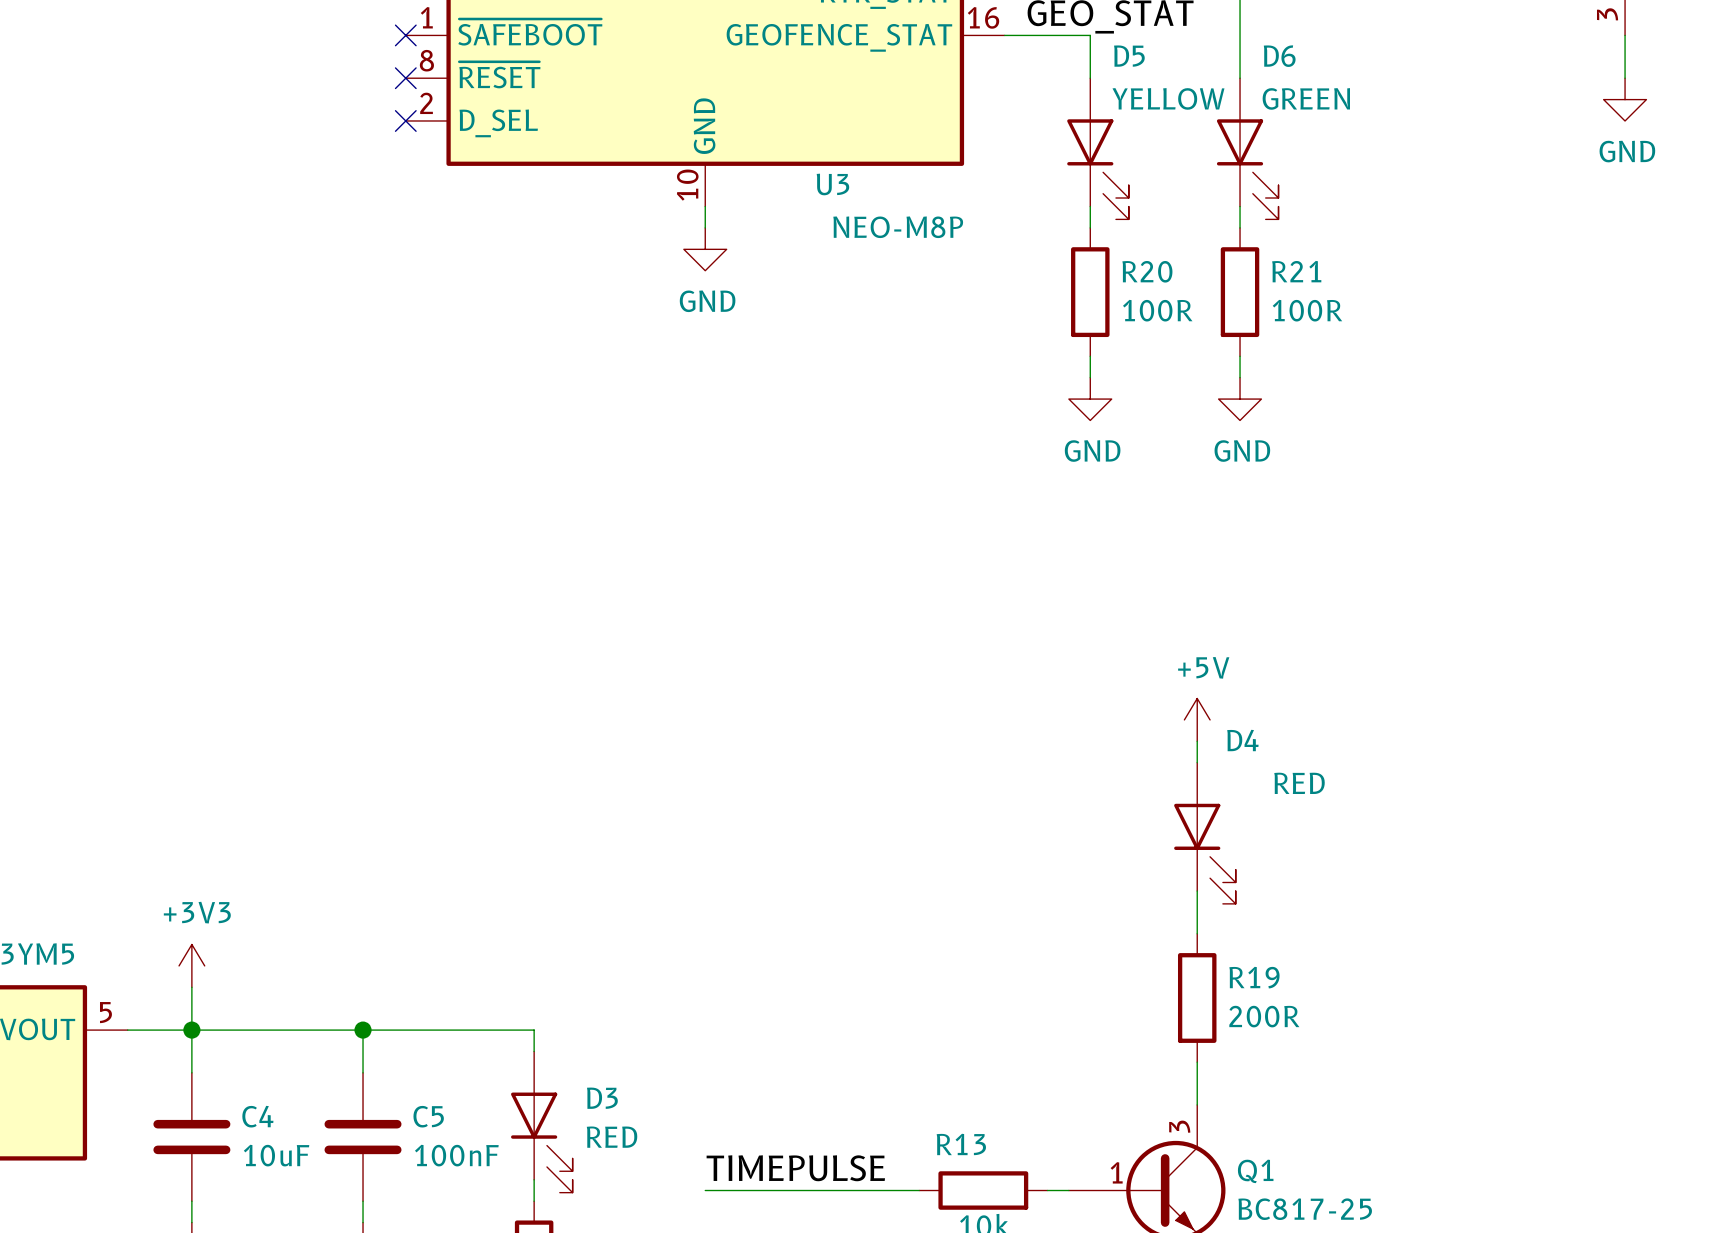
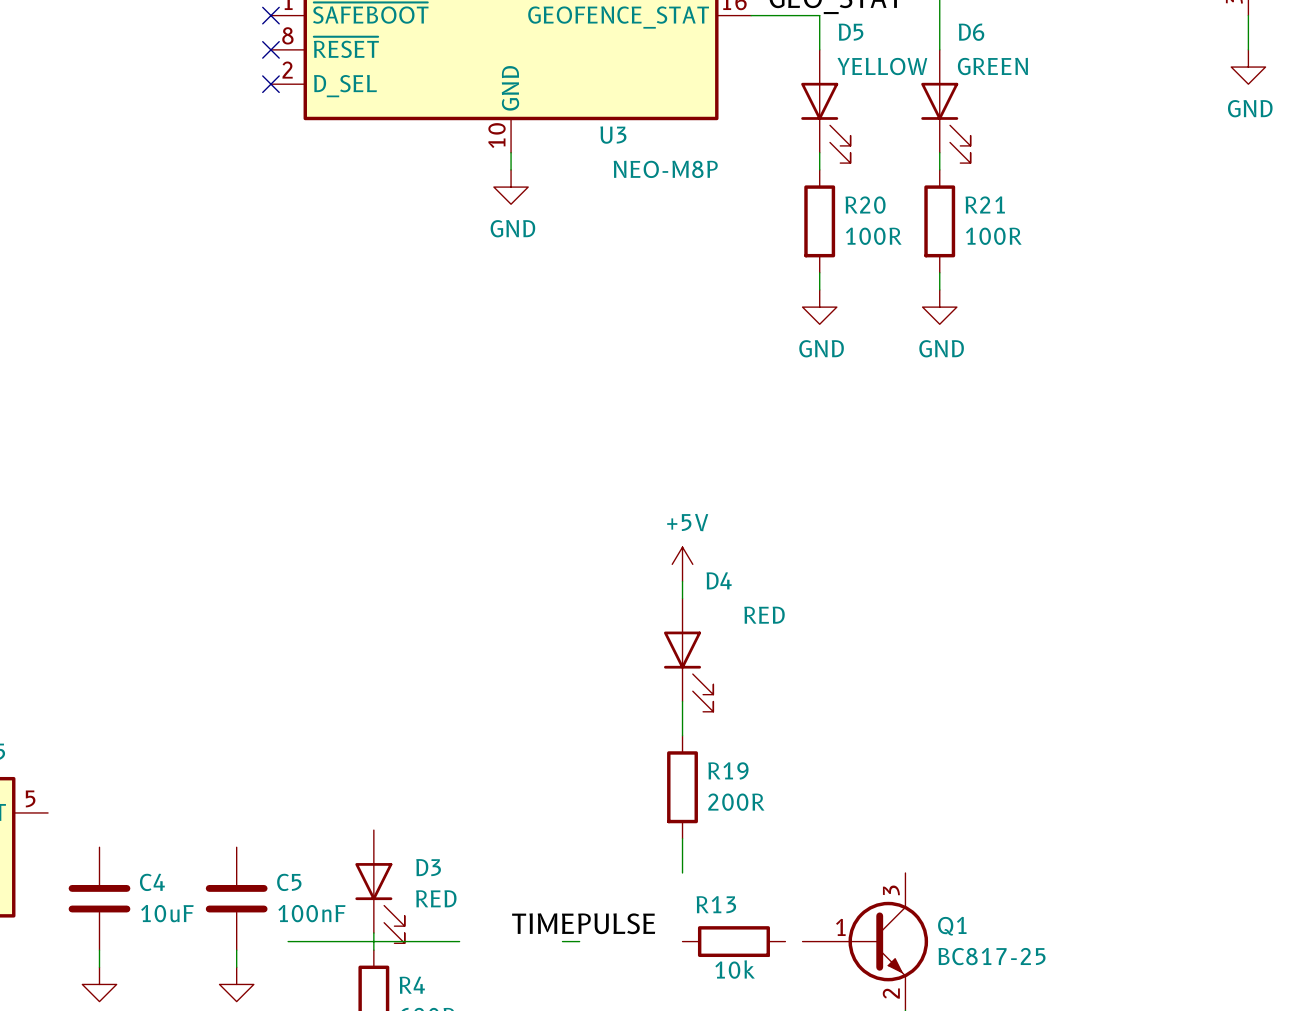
power symbol position: +5V (1197, 719) -> +5V (682, 564)
wire: (1197, 741) (1197, 762) -> (682, 581) (682, 598)
D4 position: (1204, 833) -> (688, 655)
wire: (1197, 891) (1197, 933) -> (682, 701) (682, 735)
power symbol: +3V3 (191, 965) -> none
wire: (191, 987) (191, 1072) -> none
R19 position: (1197, 998) -> (682, 787)
wire: (127, 1030) (534, 1030) (534, 1051) -> none
junction: (191, 1030) -> none
wire: (363, 1030) (363, 1072) -> none
junction: (363, 1030) -> none
wire: (1197, 1062) (1197, 1104) -> (682, 838) (682, 872)
wire: none -> (288, 941) (459, 941)
wire: (705, 1190) (769, 1190) -> none
wire: (790, 1190) (919, 1190) -> none
wire: (1047, 1190) (1068, 1190) -> none

